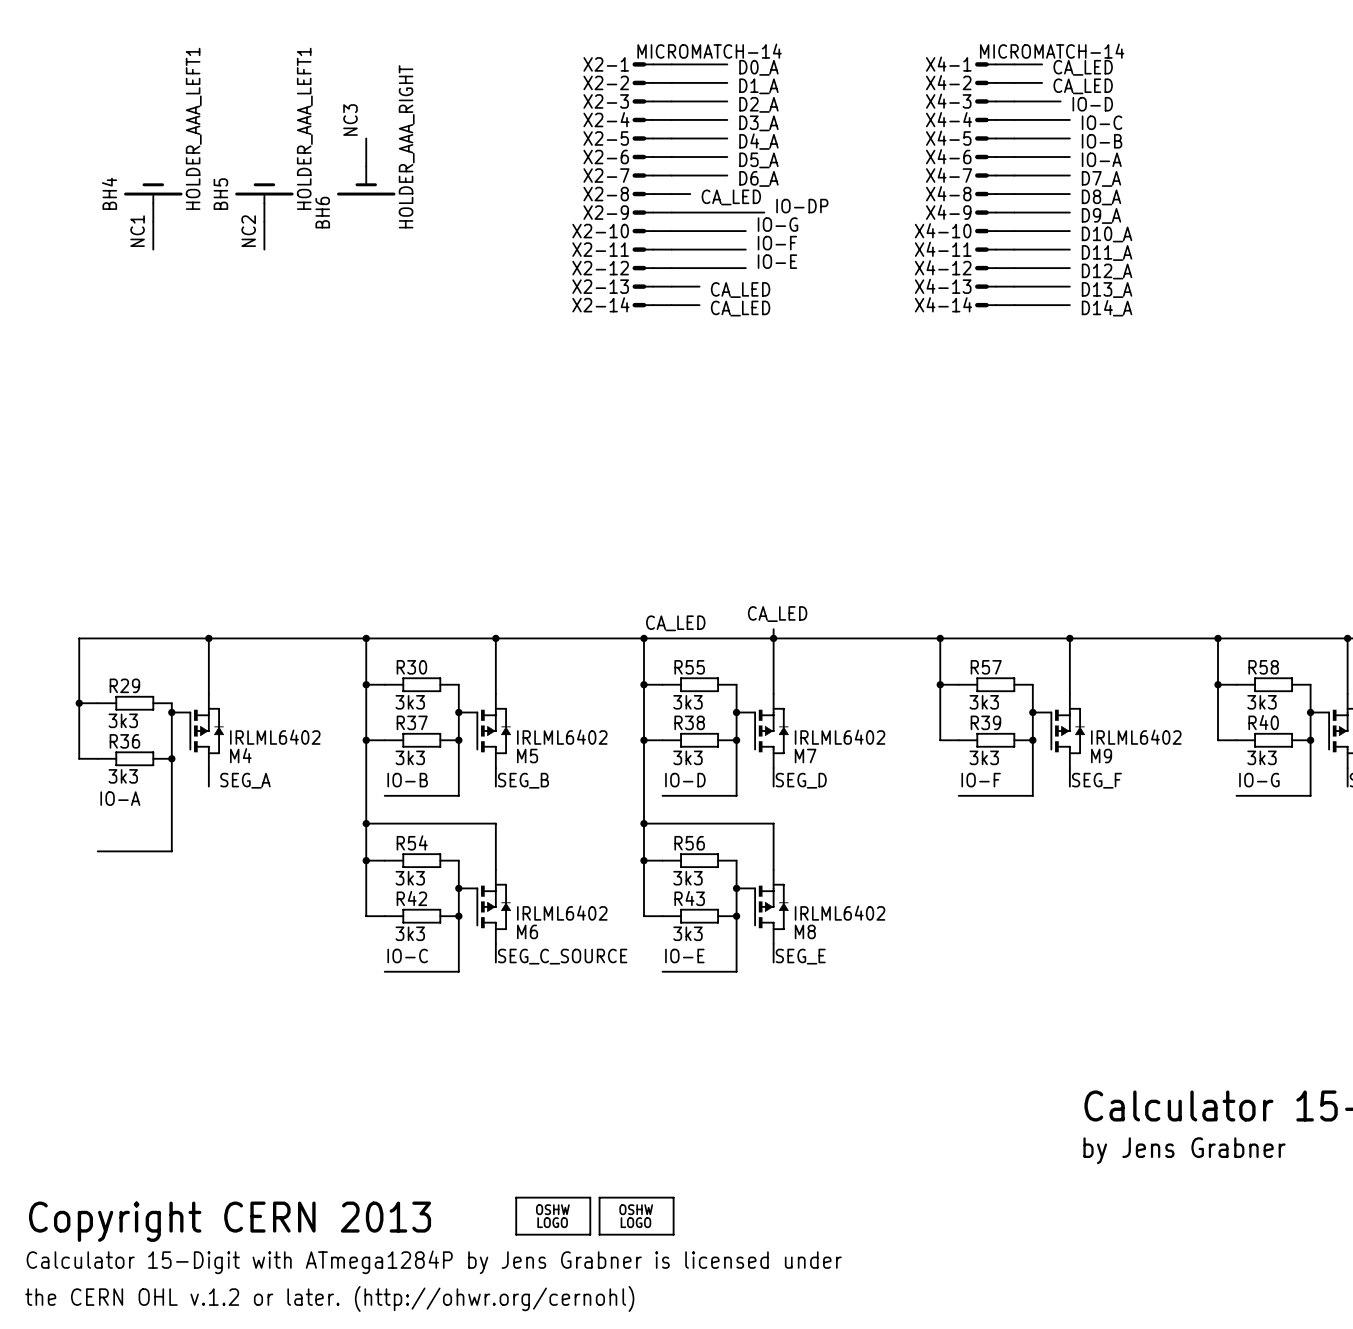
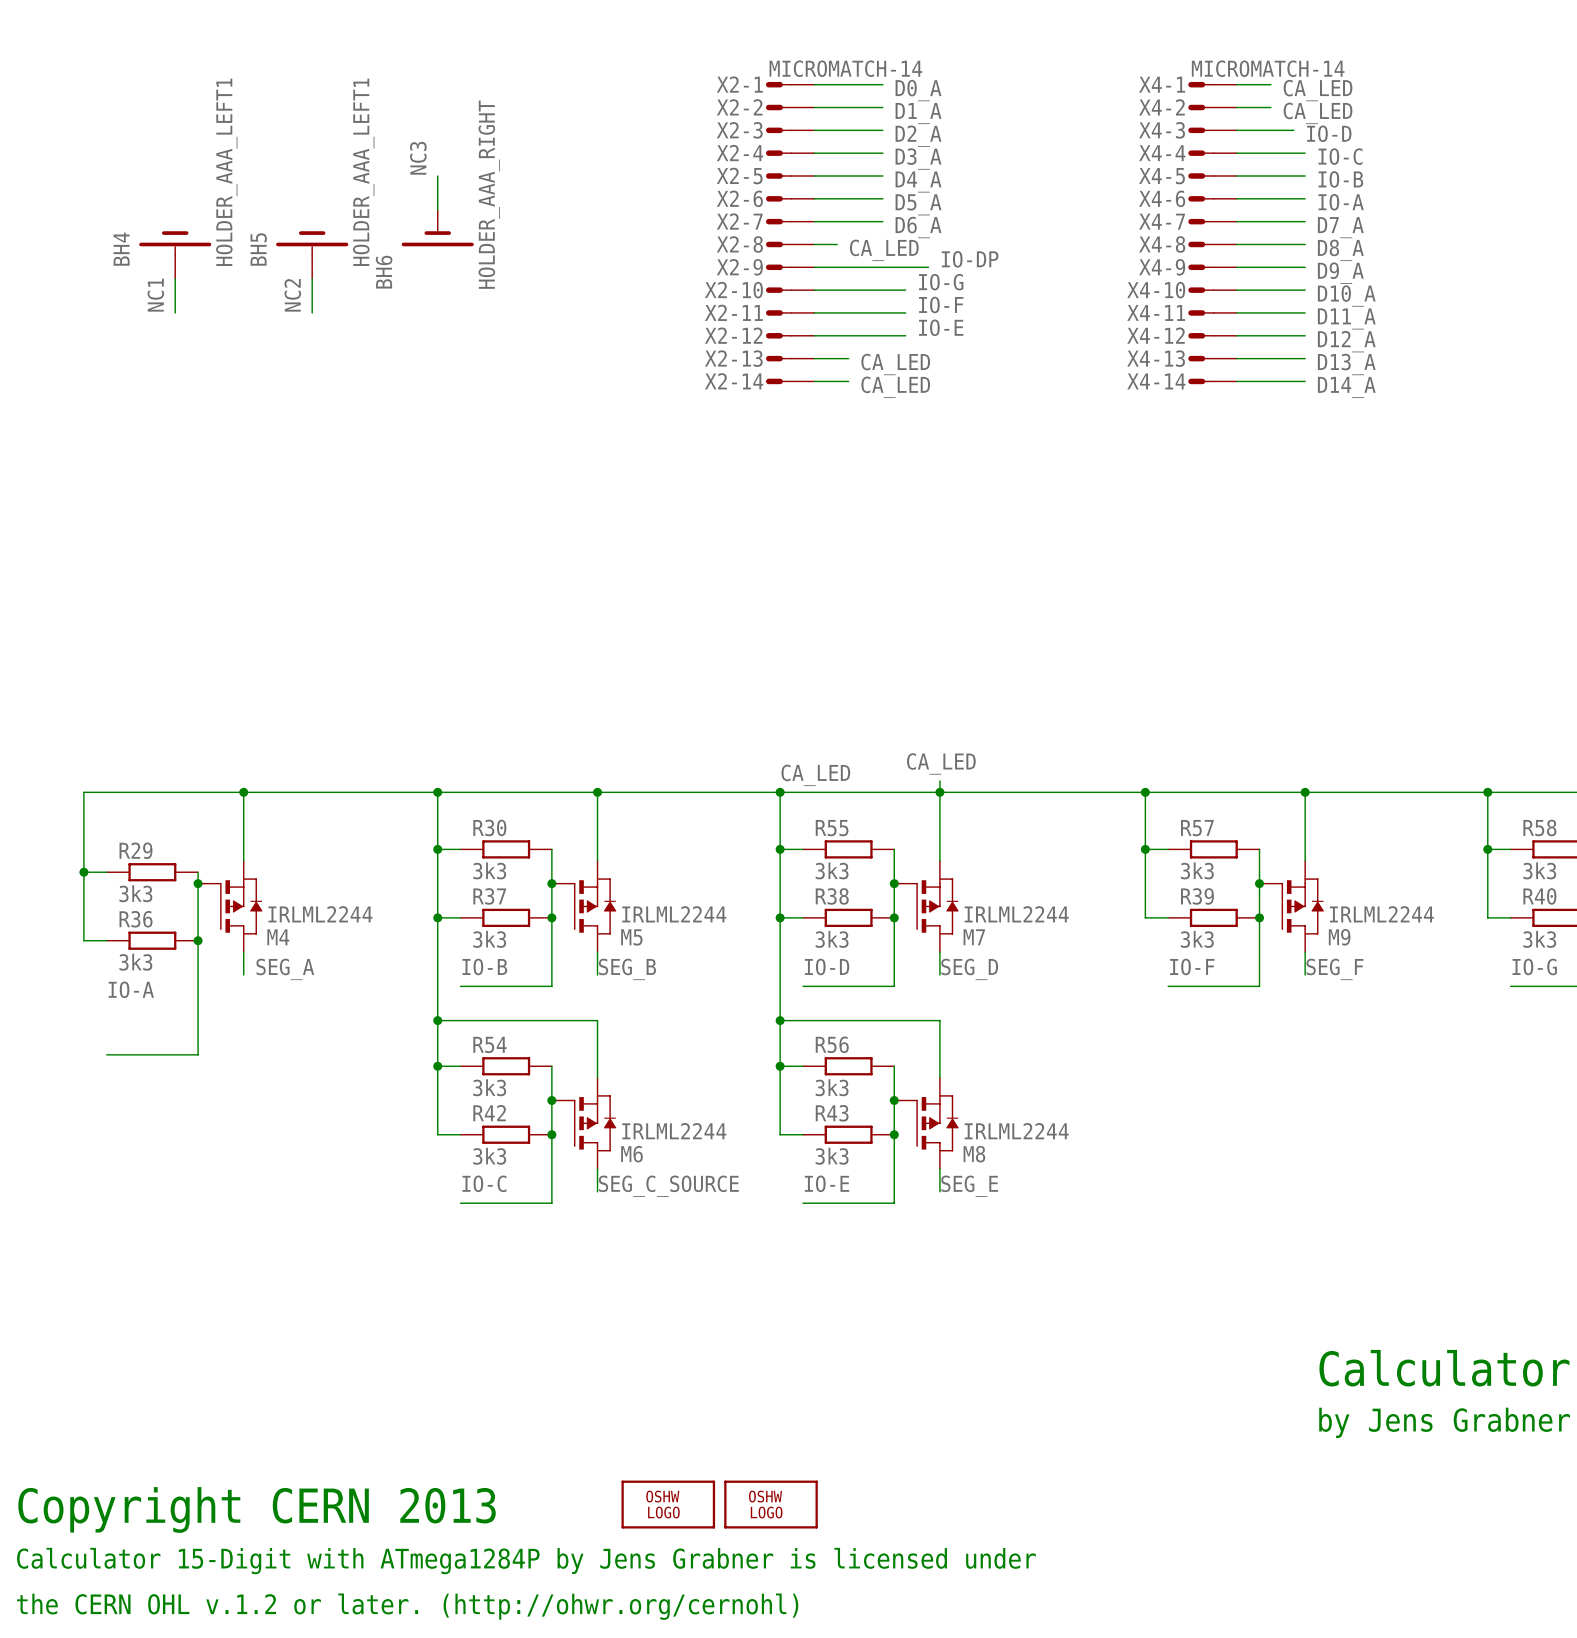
M4 value: IRLML6402 (275, 737) -> IRLML2244 (320, 914)
M5 value: IRLML6402 (562, 737) -> IRLML2244 (674, 914)
M7 value: IRLML6402 (840, 737) -> IRLML2244 (1016, 914)
M9 value: IRLML6402 (1136, 737) -> IRLML2244 (1381, 914)
M6 value: IRLML6402 (562, 913) -> IRLML2244 (674, 1131)
M8 value: IRLML6402 (840, 913) -> IRLML2244 (1016, 1131)

